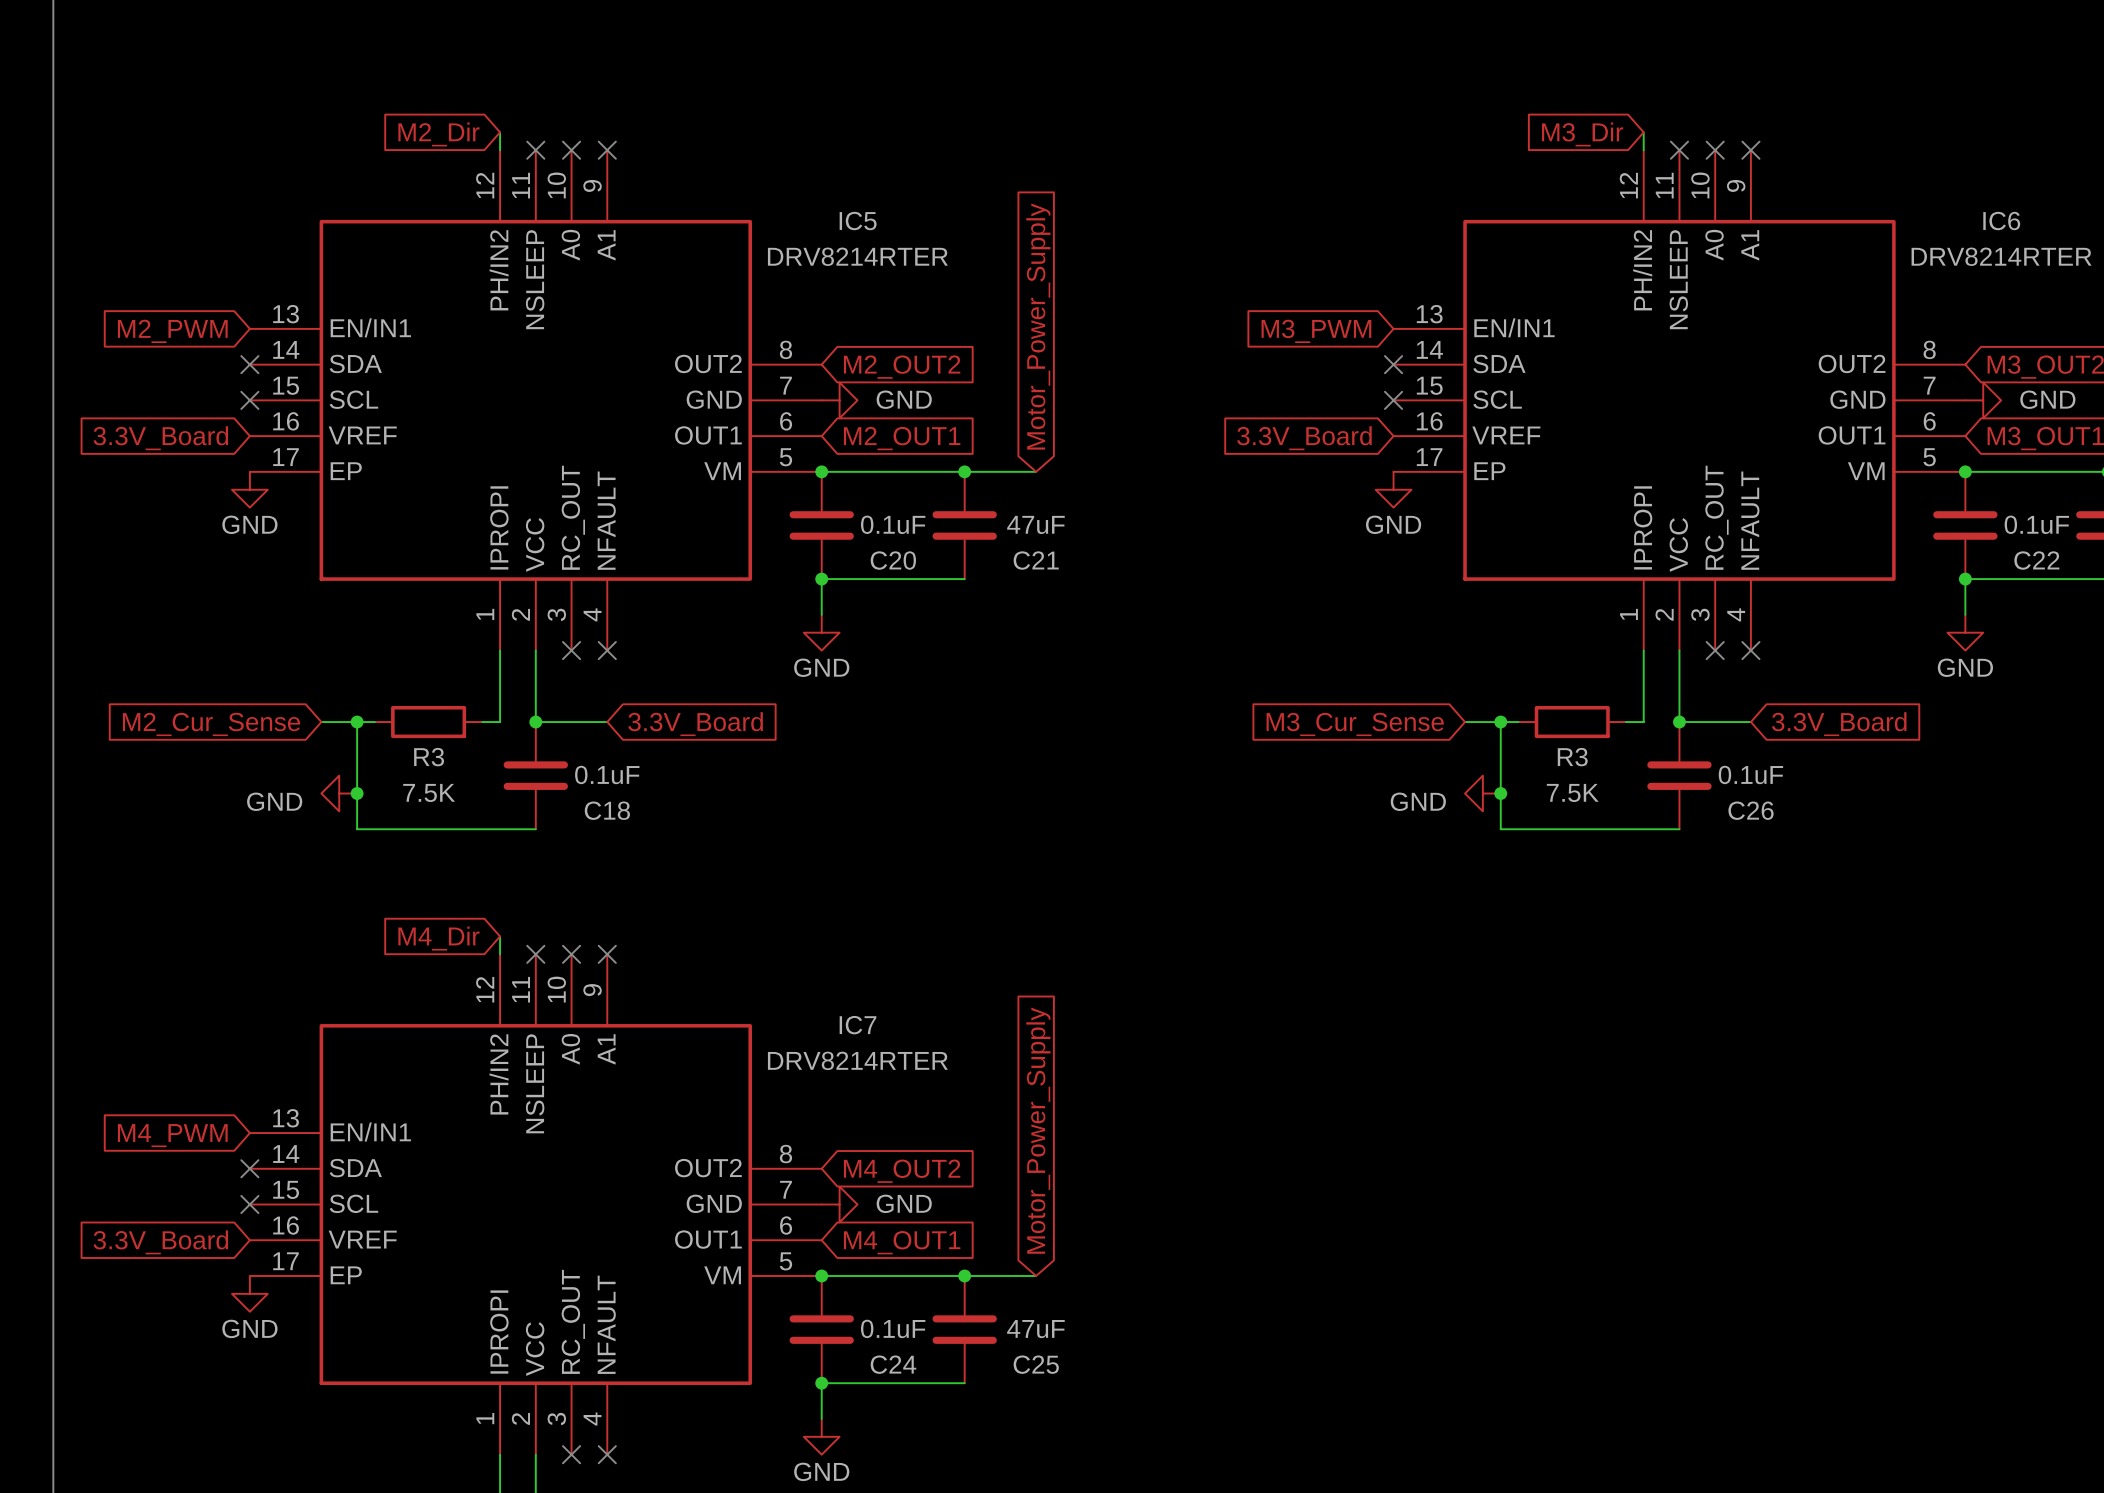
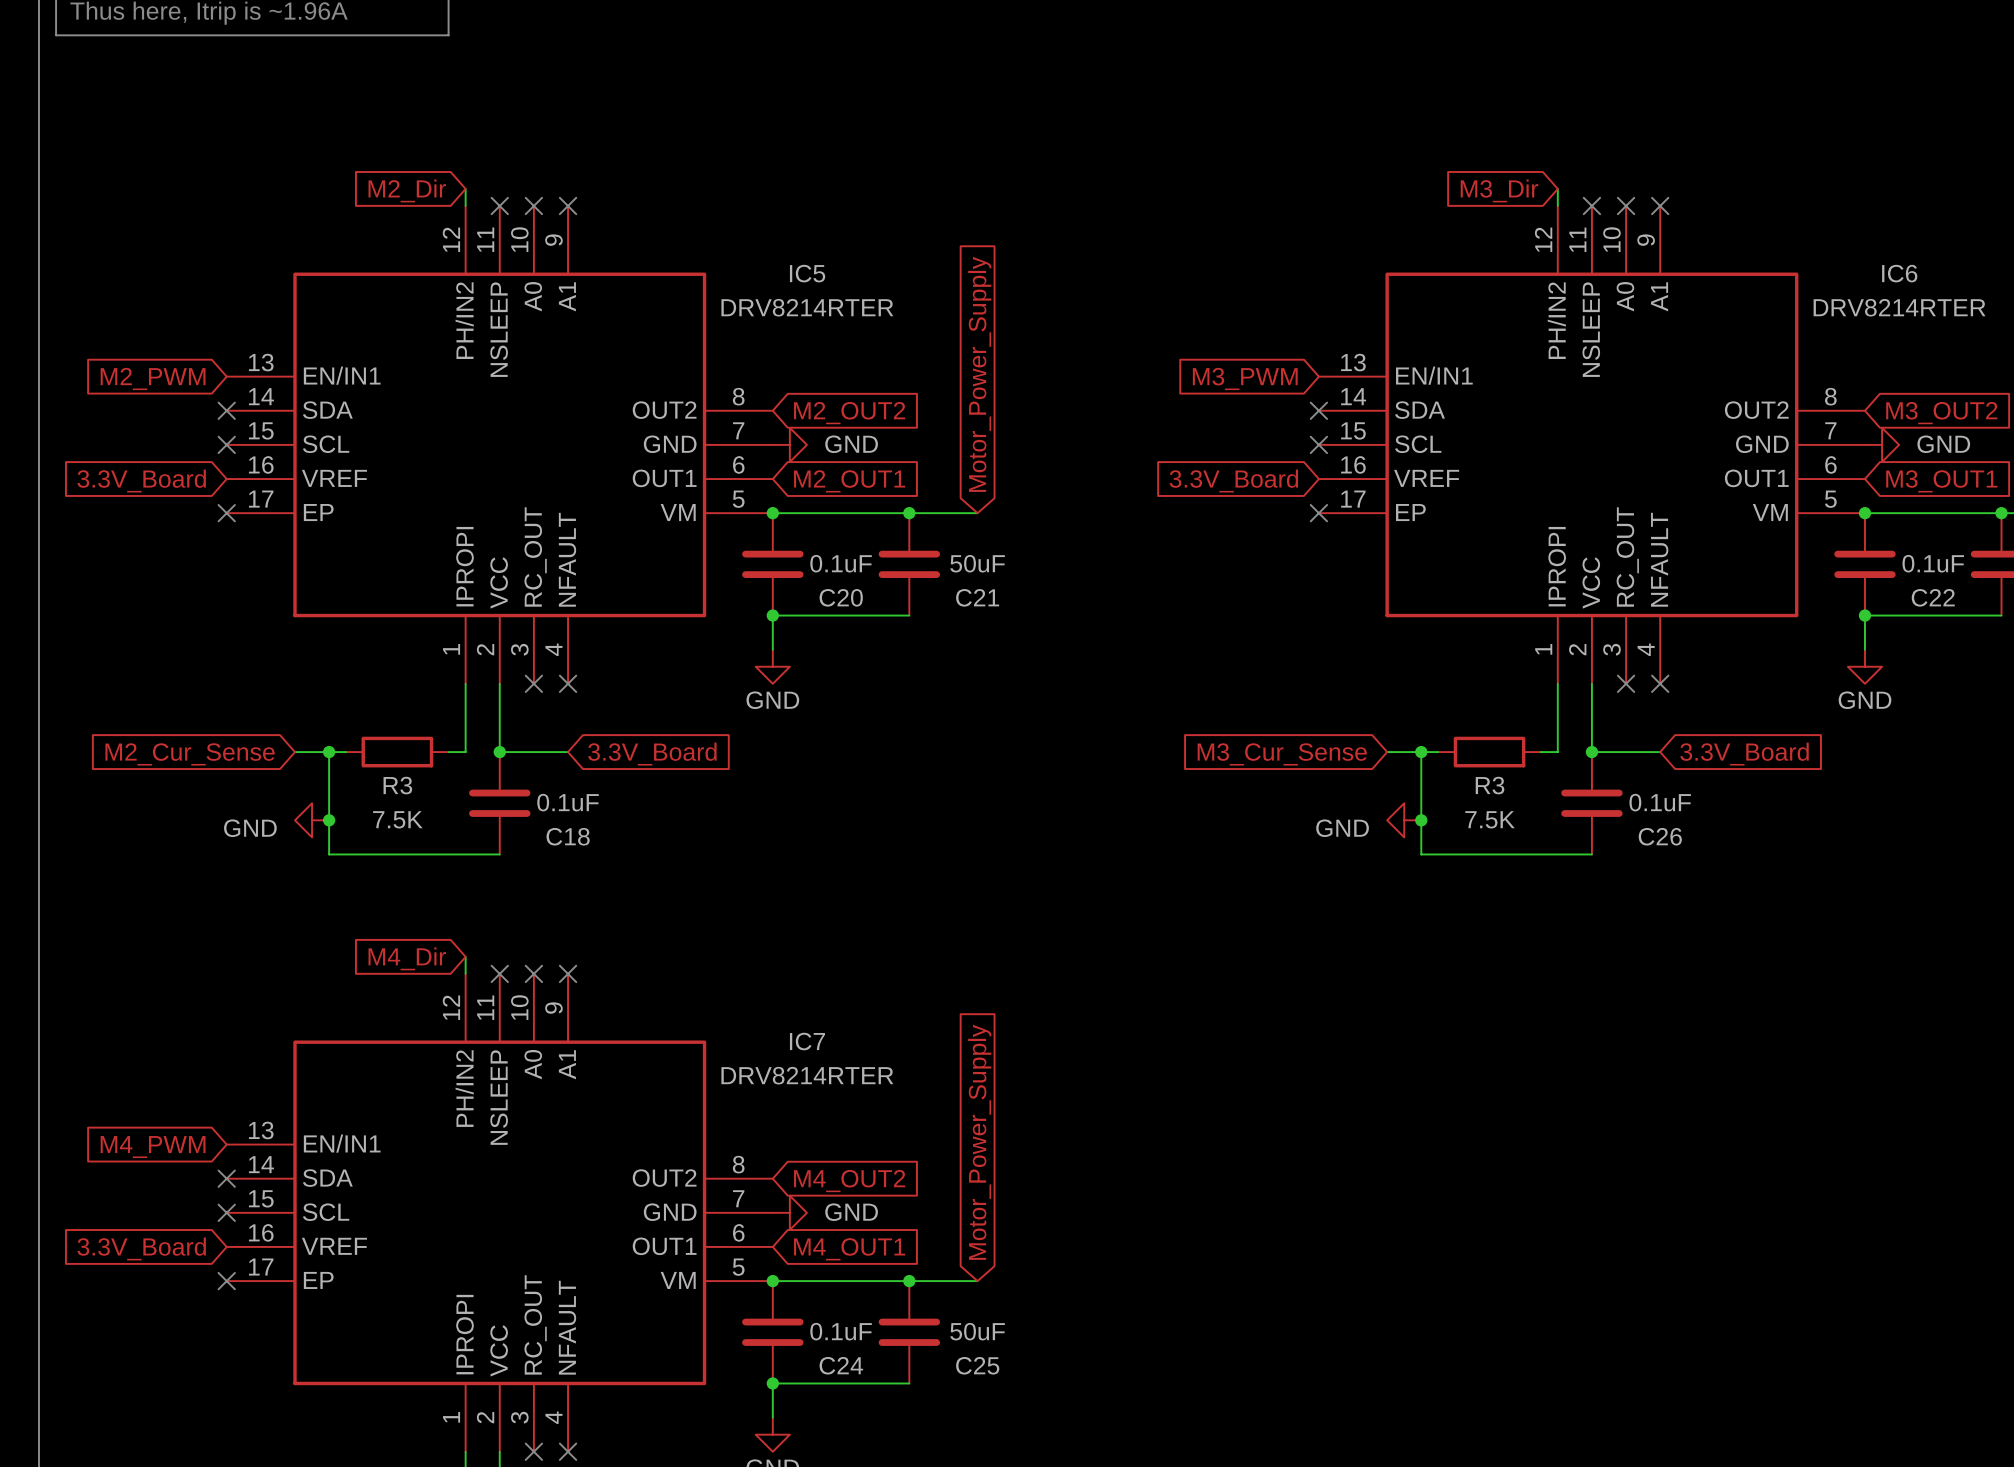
no-connect mark: none -> (226, 513)
no-connect mark: none -> (1318, 513)
power symbol: GND (249, 489) -> none
power symbol: GND (1393, 489) -> none
C21 value: 47uF (1035, 524) -> 50uF (977, 563)
no-connect mark: none -> (226, 1281)
power symbol: GND (249, 1293) -> none
C25 value: 47uF (1035, 1329) -> 50uF (977, 1331)

